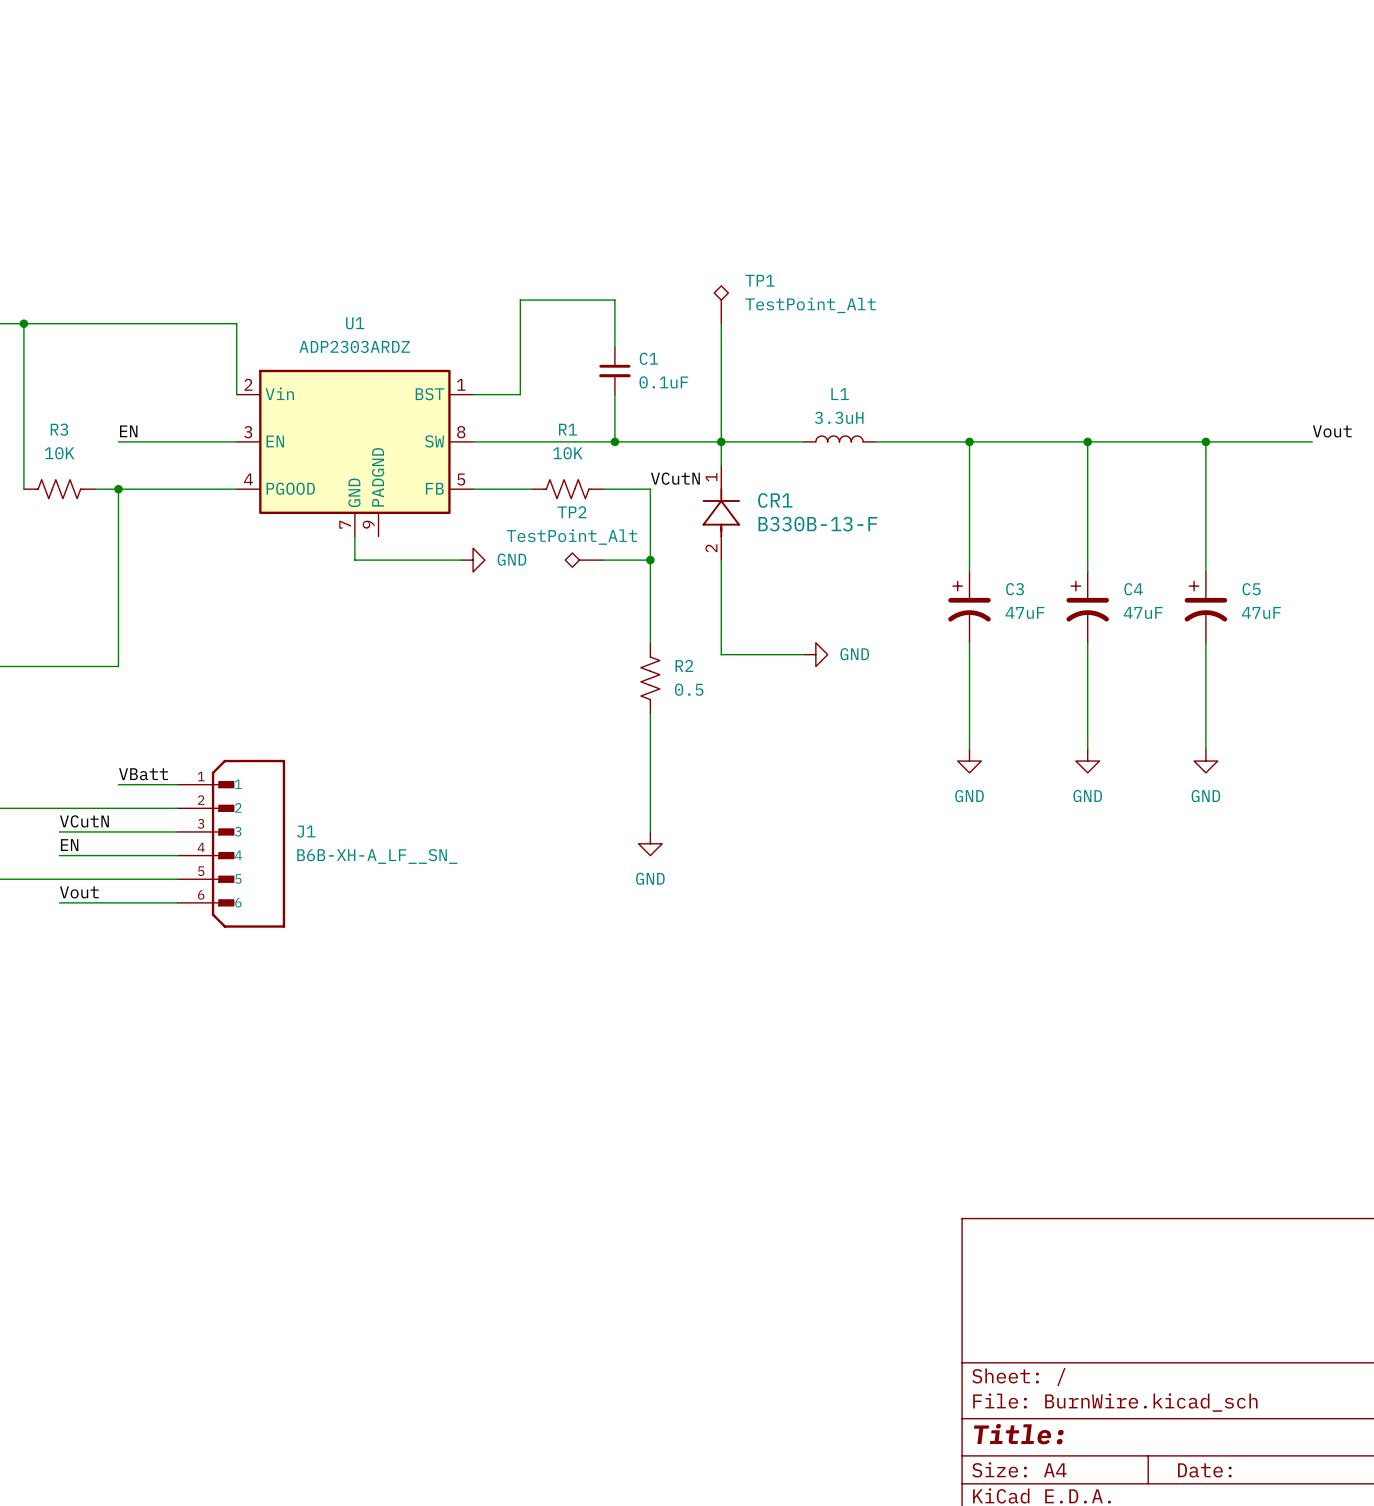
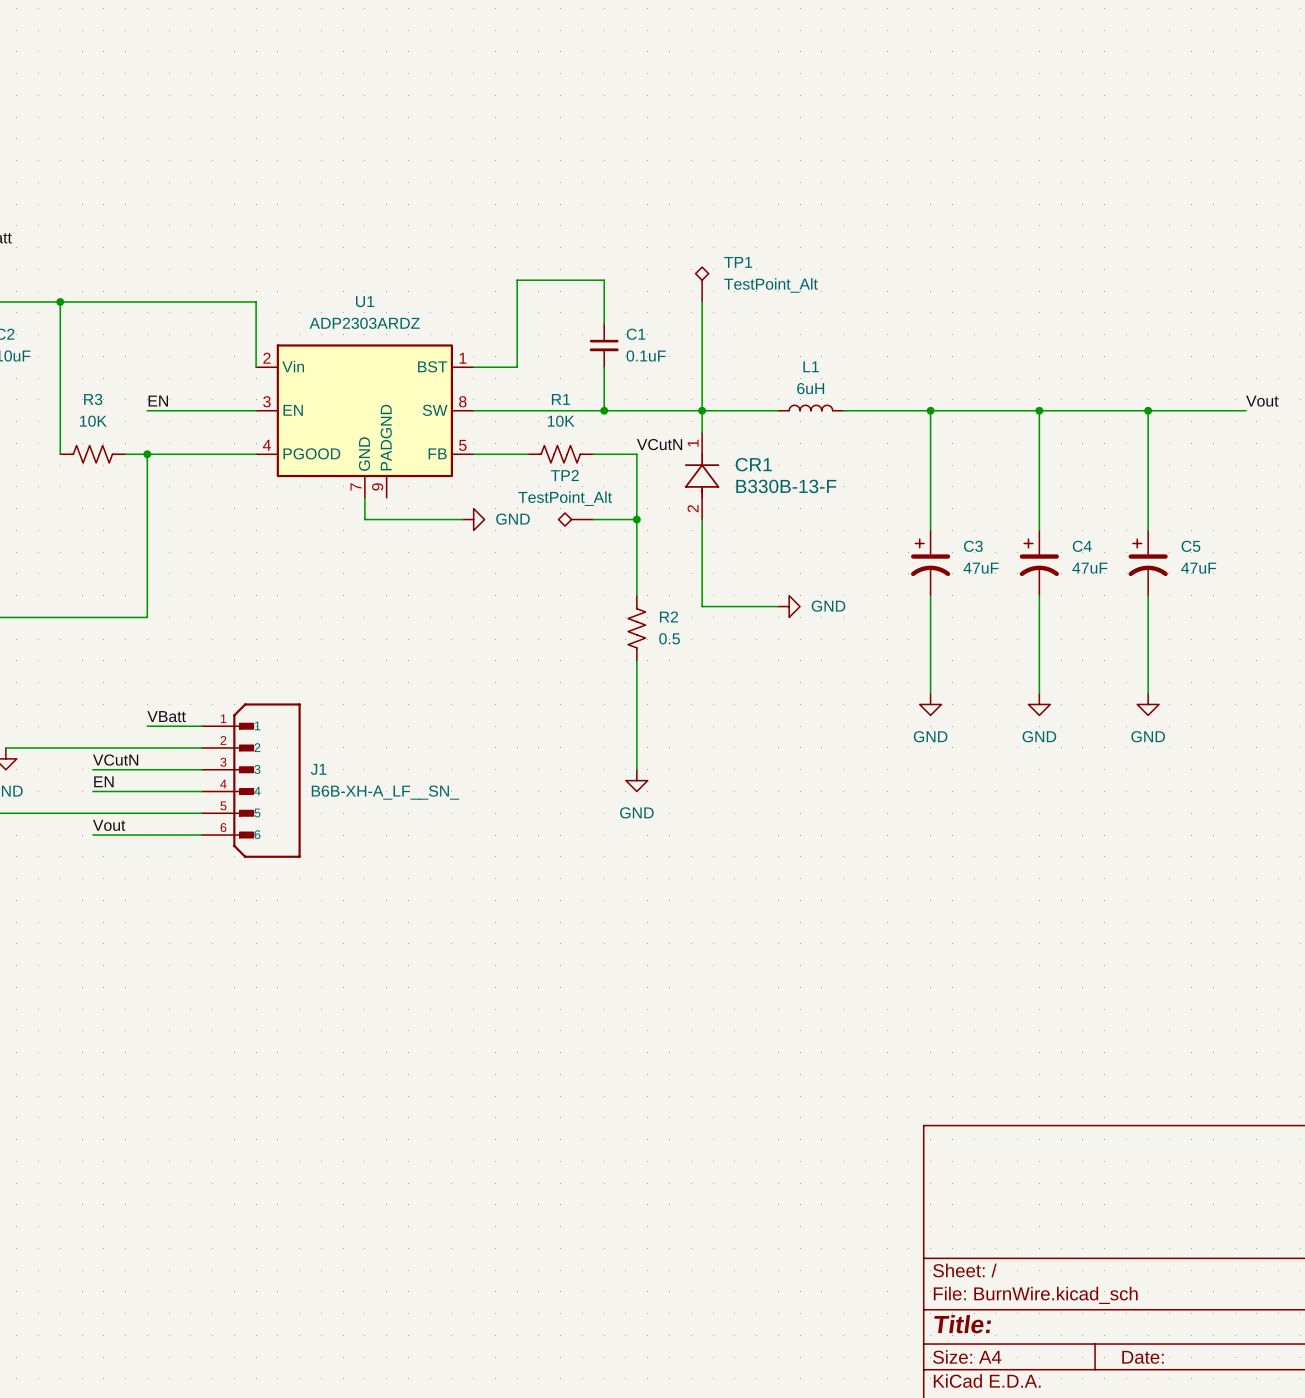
L1 value: 3.3uH (839, 417) -> 6uH (810, 388)

